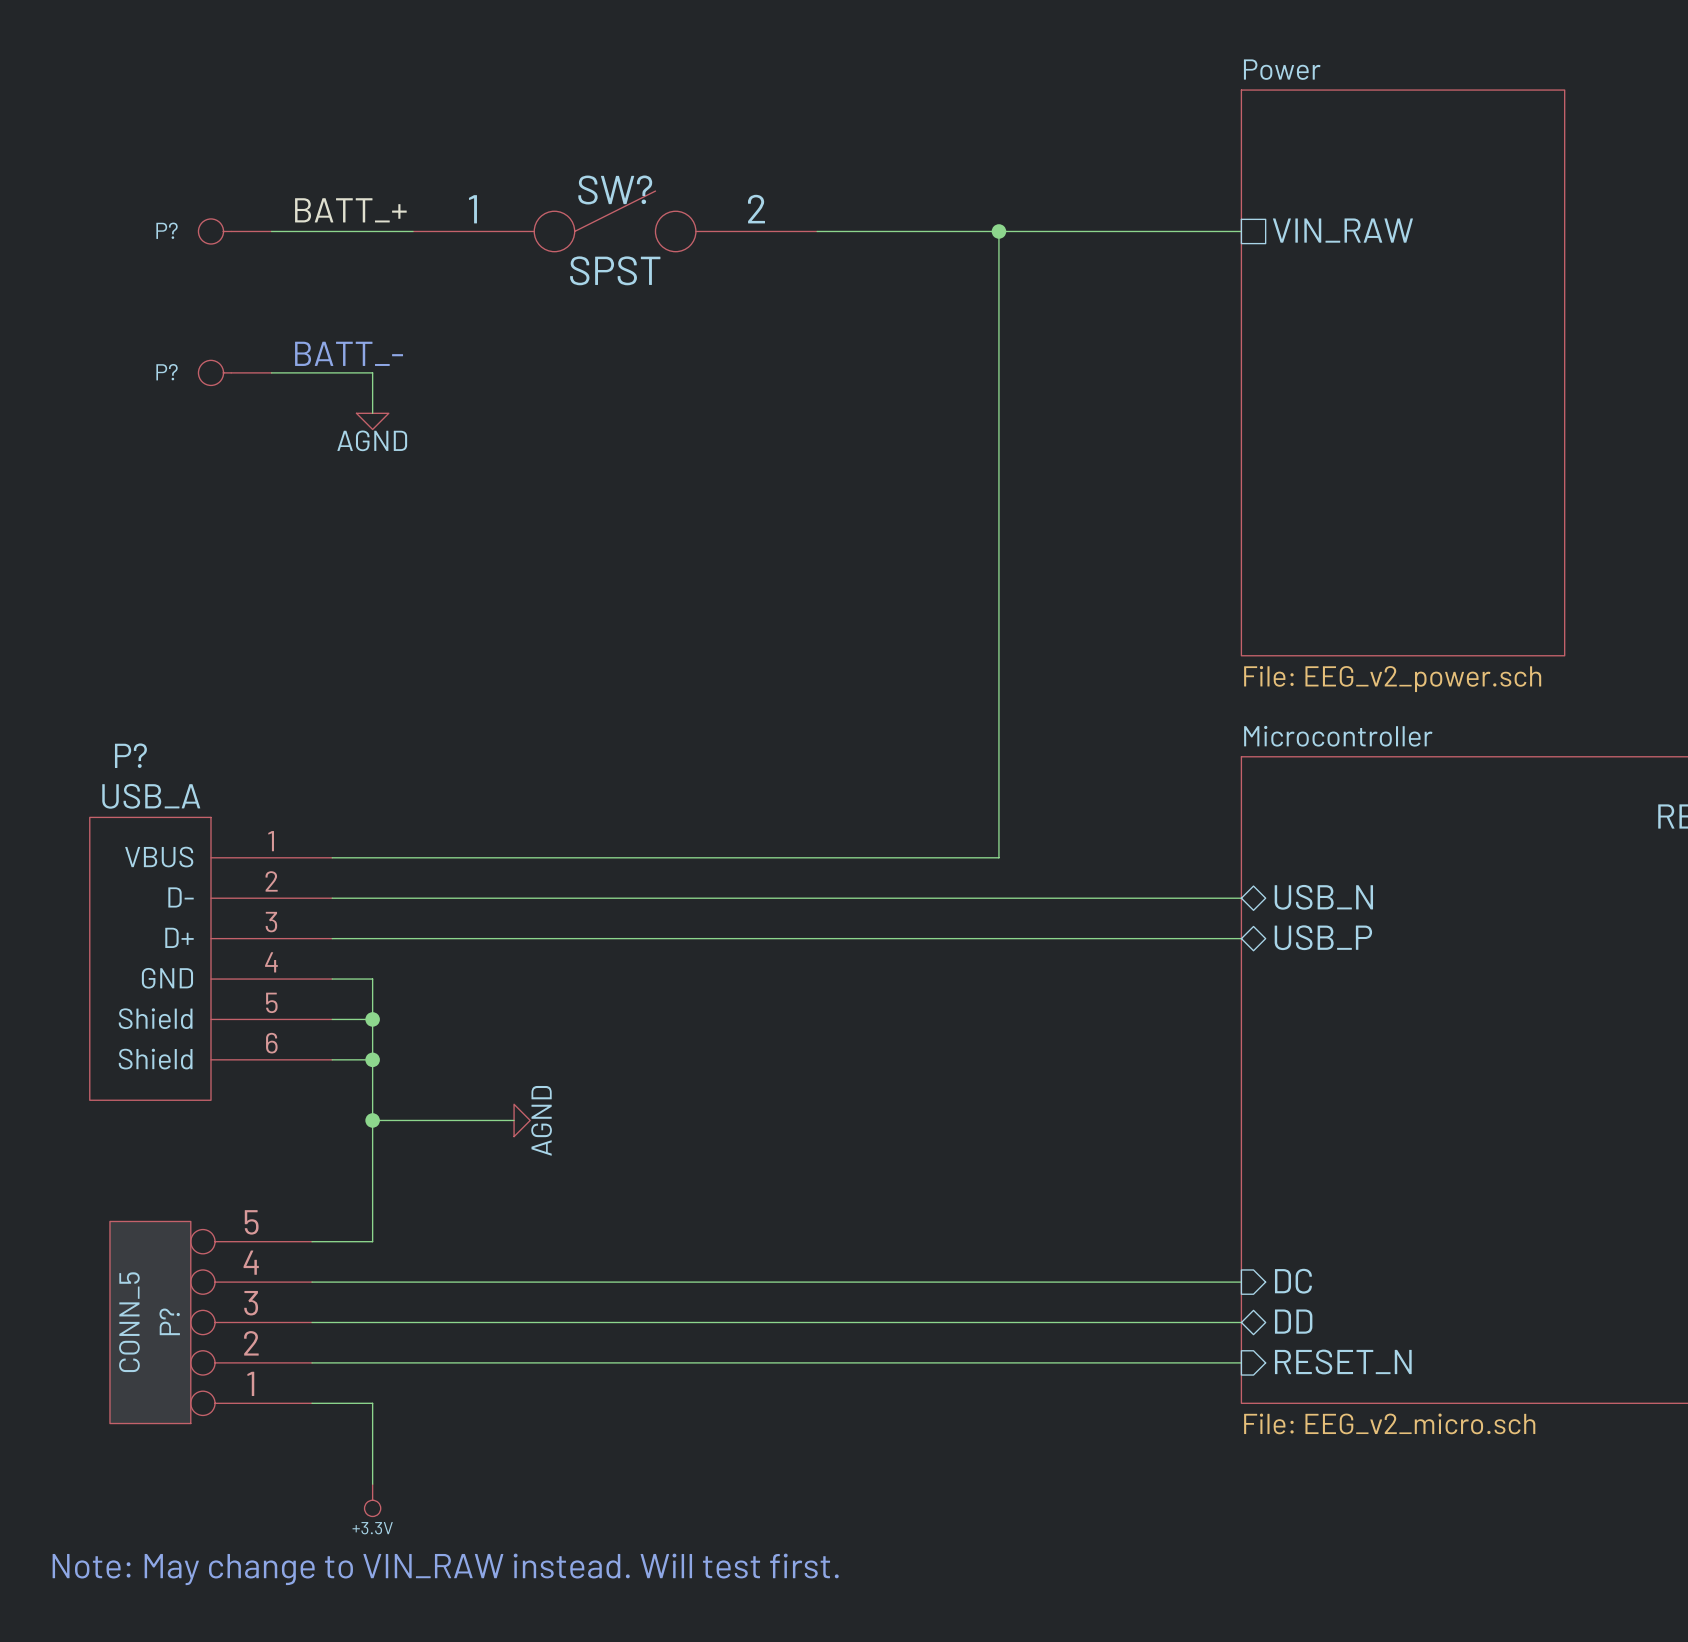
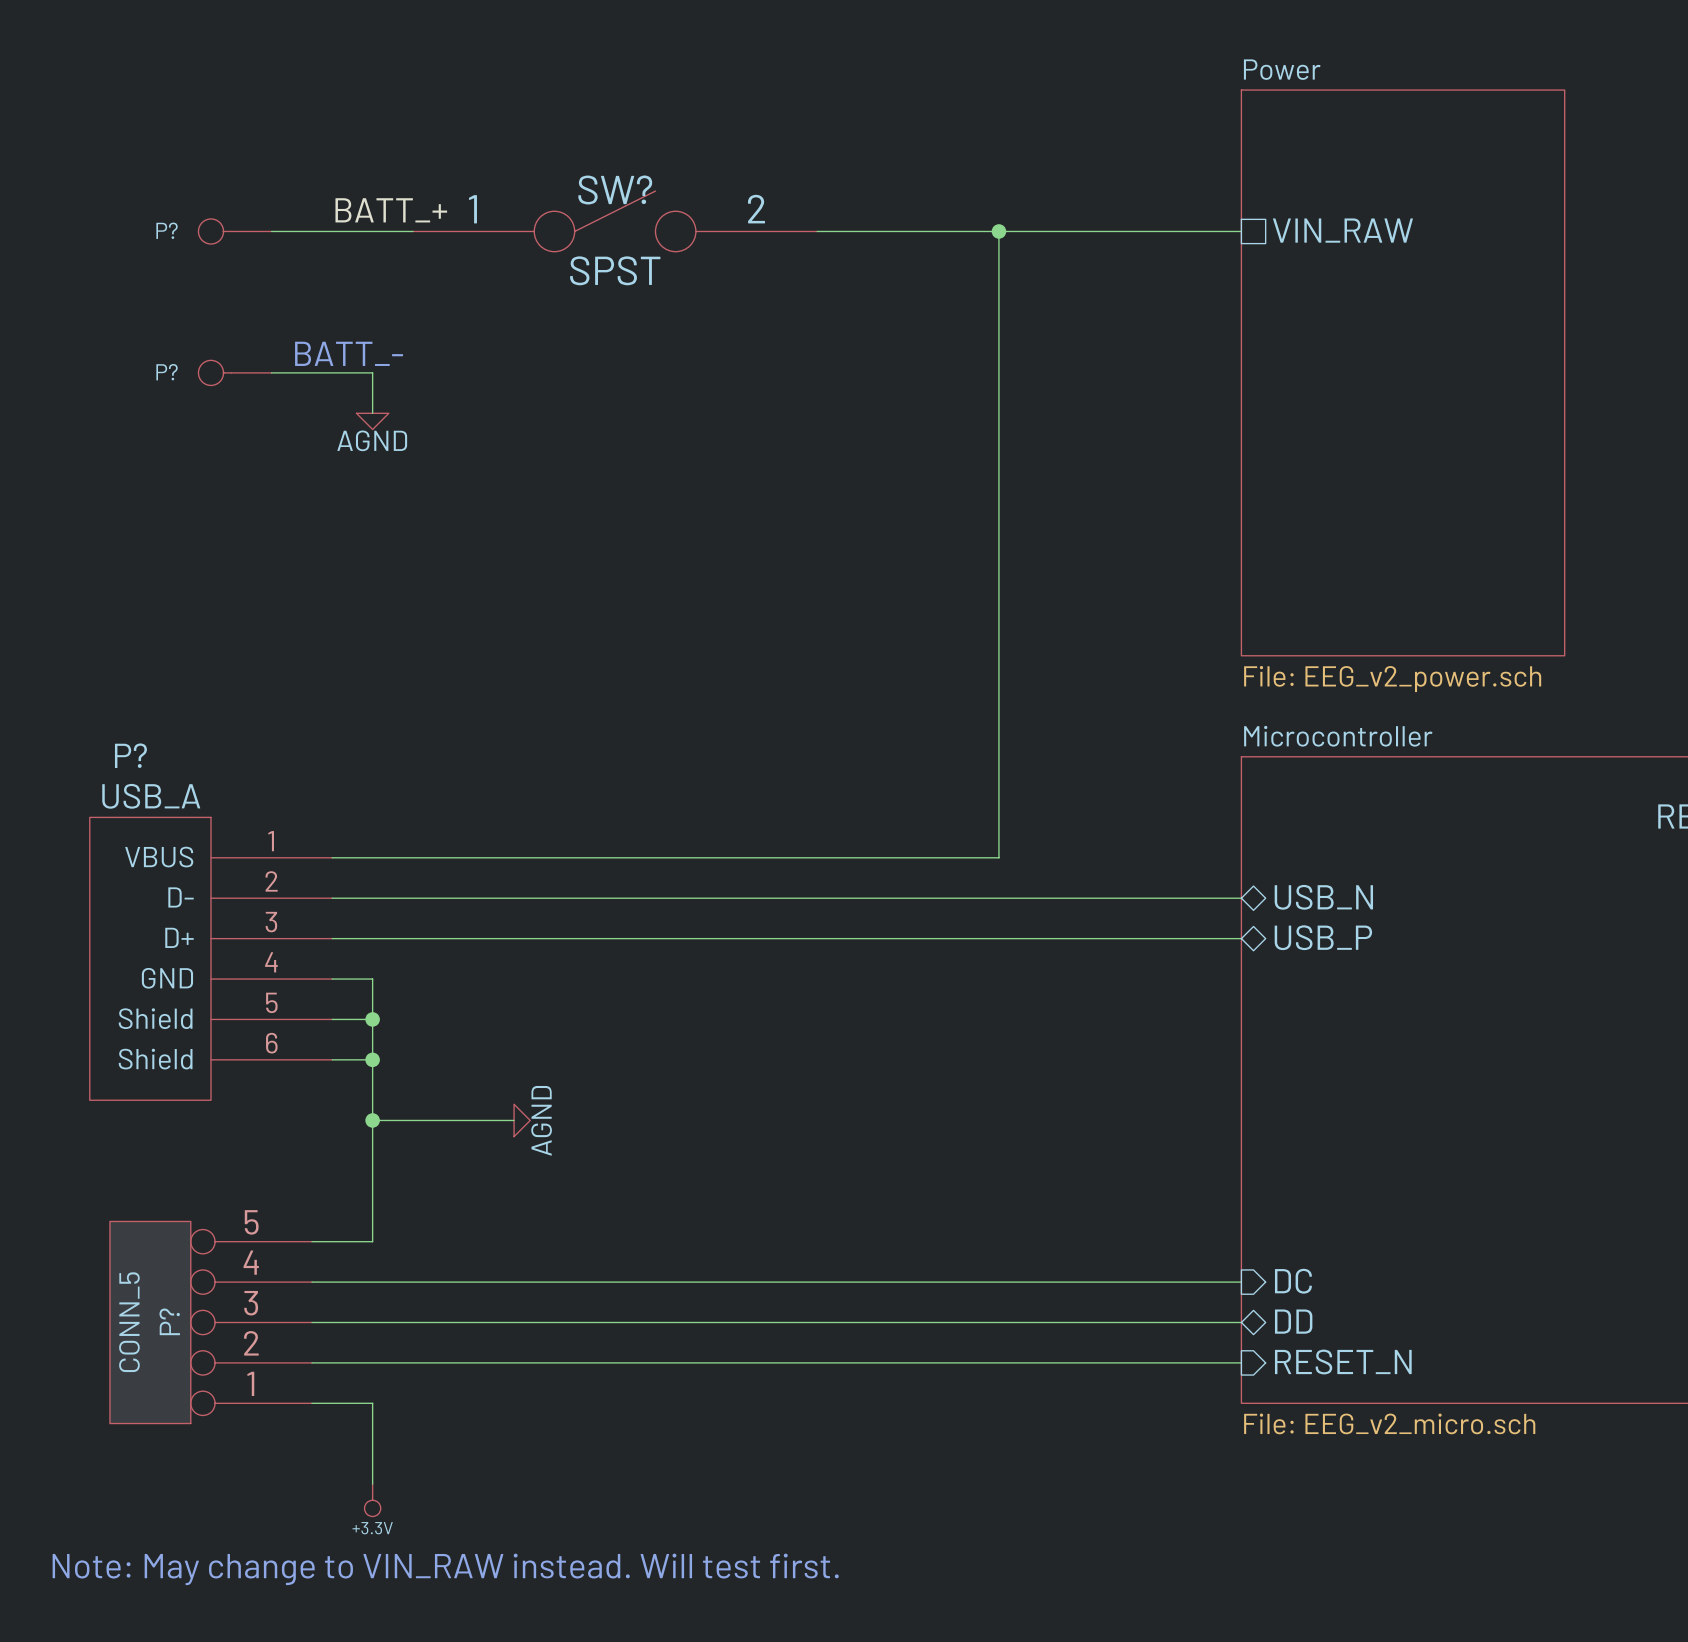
label position: BATT_+ (350, 210) -> BATT_+ (391, 210)

